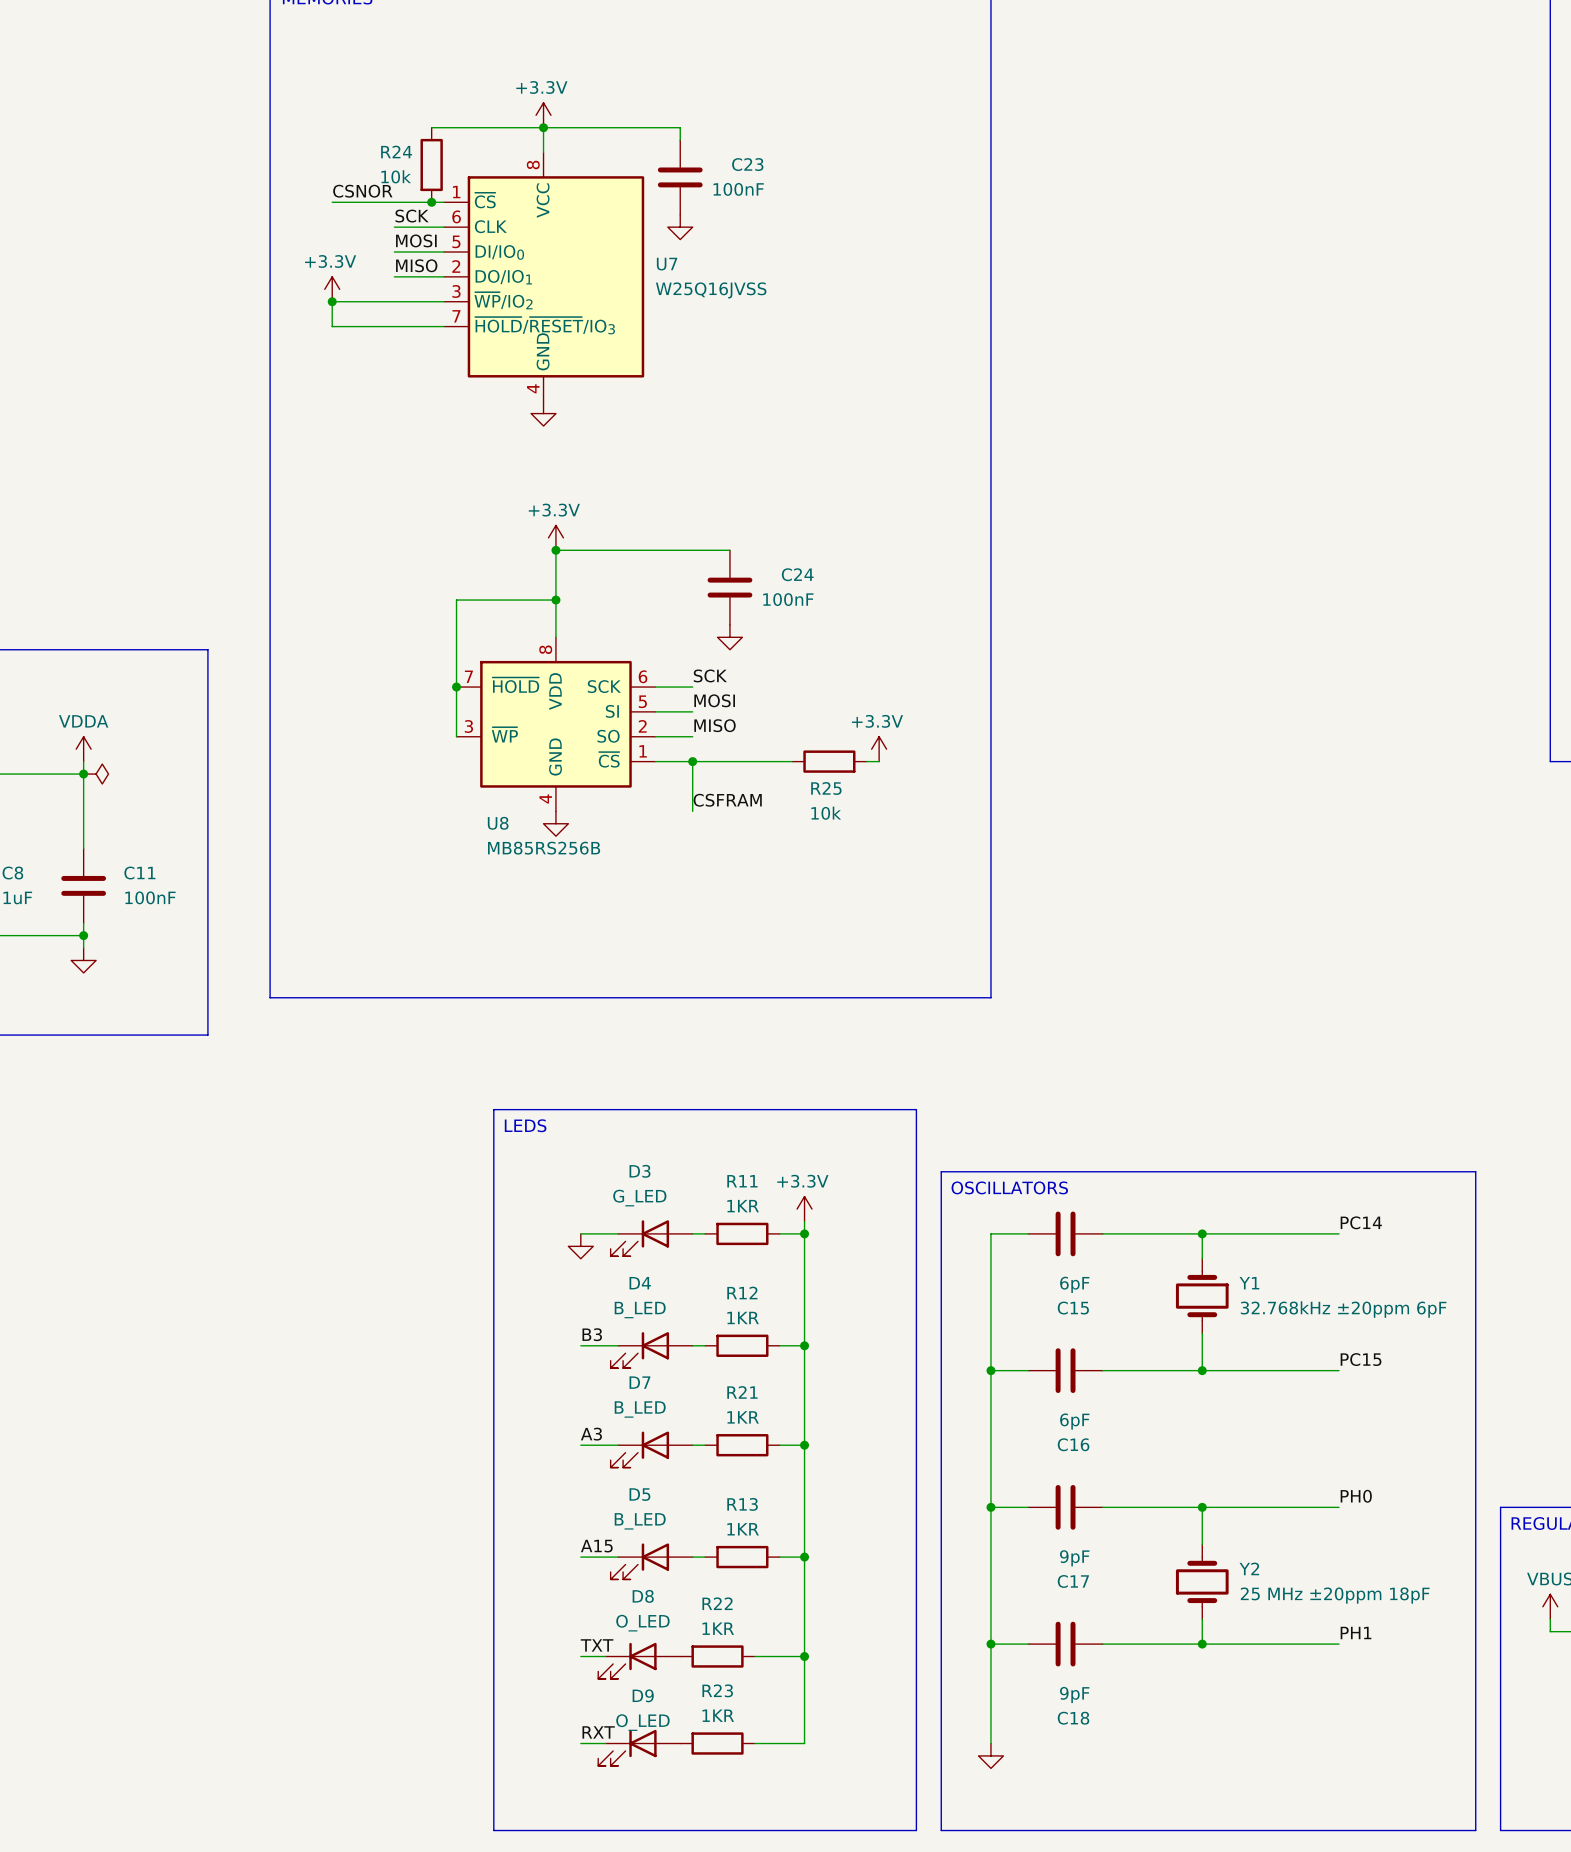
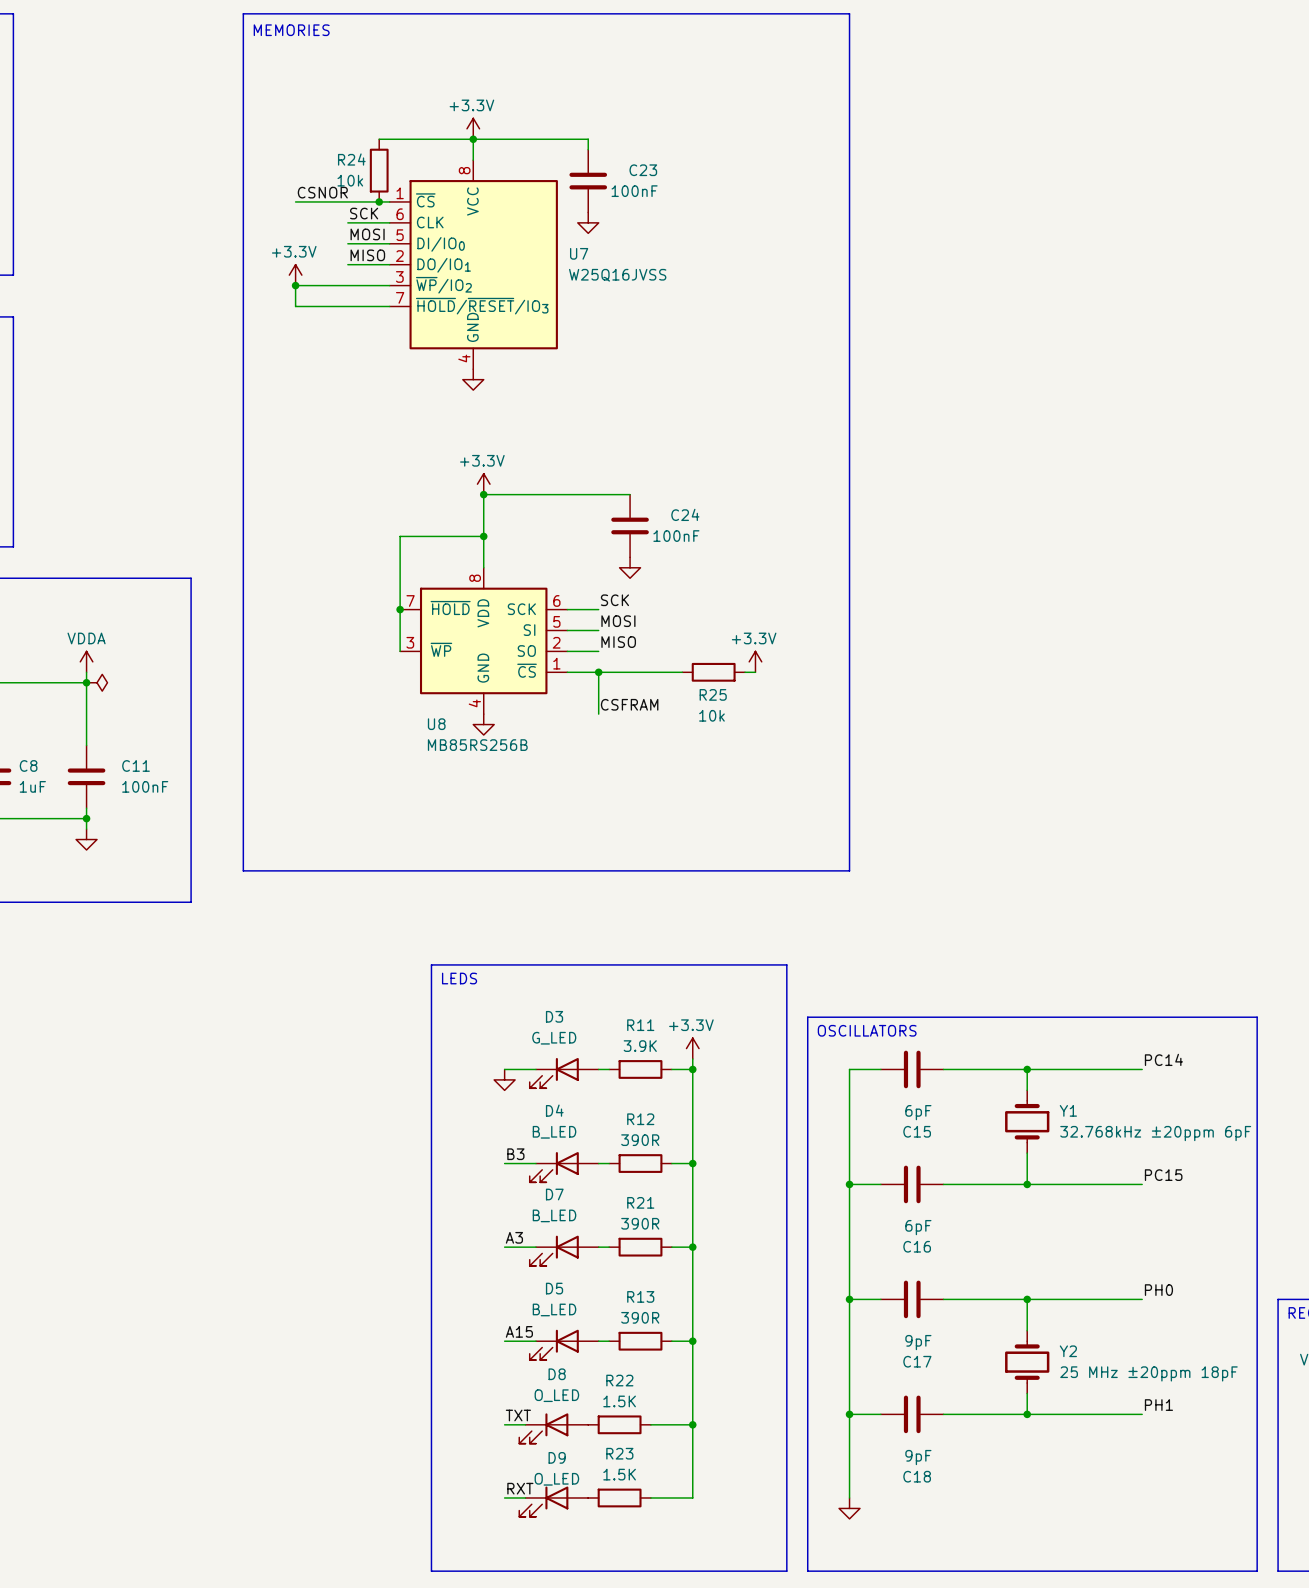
R11 value: 1KR (743, 1206) -> 3.9K (640, 1046)
R12 value: 1KR (743, 1317) -> 390R (640, 1140)
R21 value: 1KR (743, 1417) -> 390R (640, 1223)
R13 value: 1KR (743, 1529) -> 390R (640, 1317)
R22 value: 1KR (718, 1628) -> 1.5K (619, 1401)
R23 value: 1KR (718, 1715) -> 1.5K (619, 1474)

